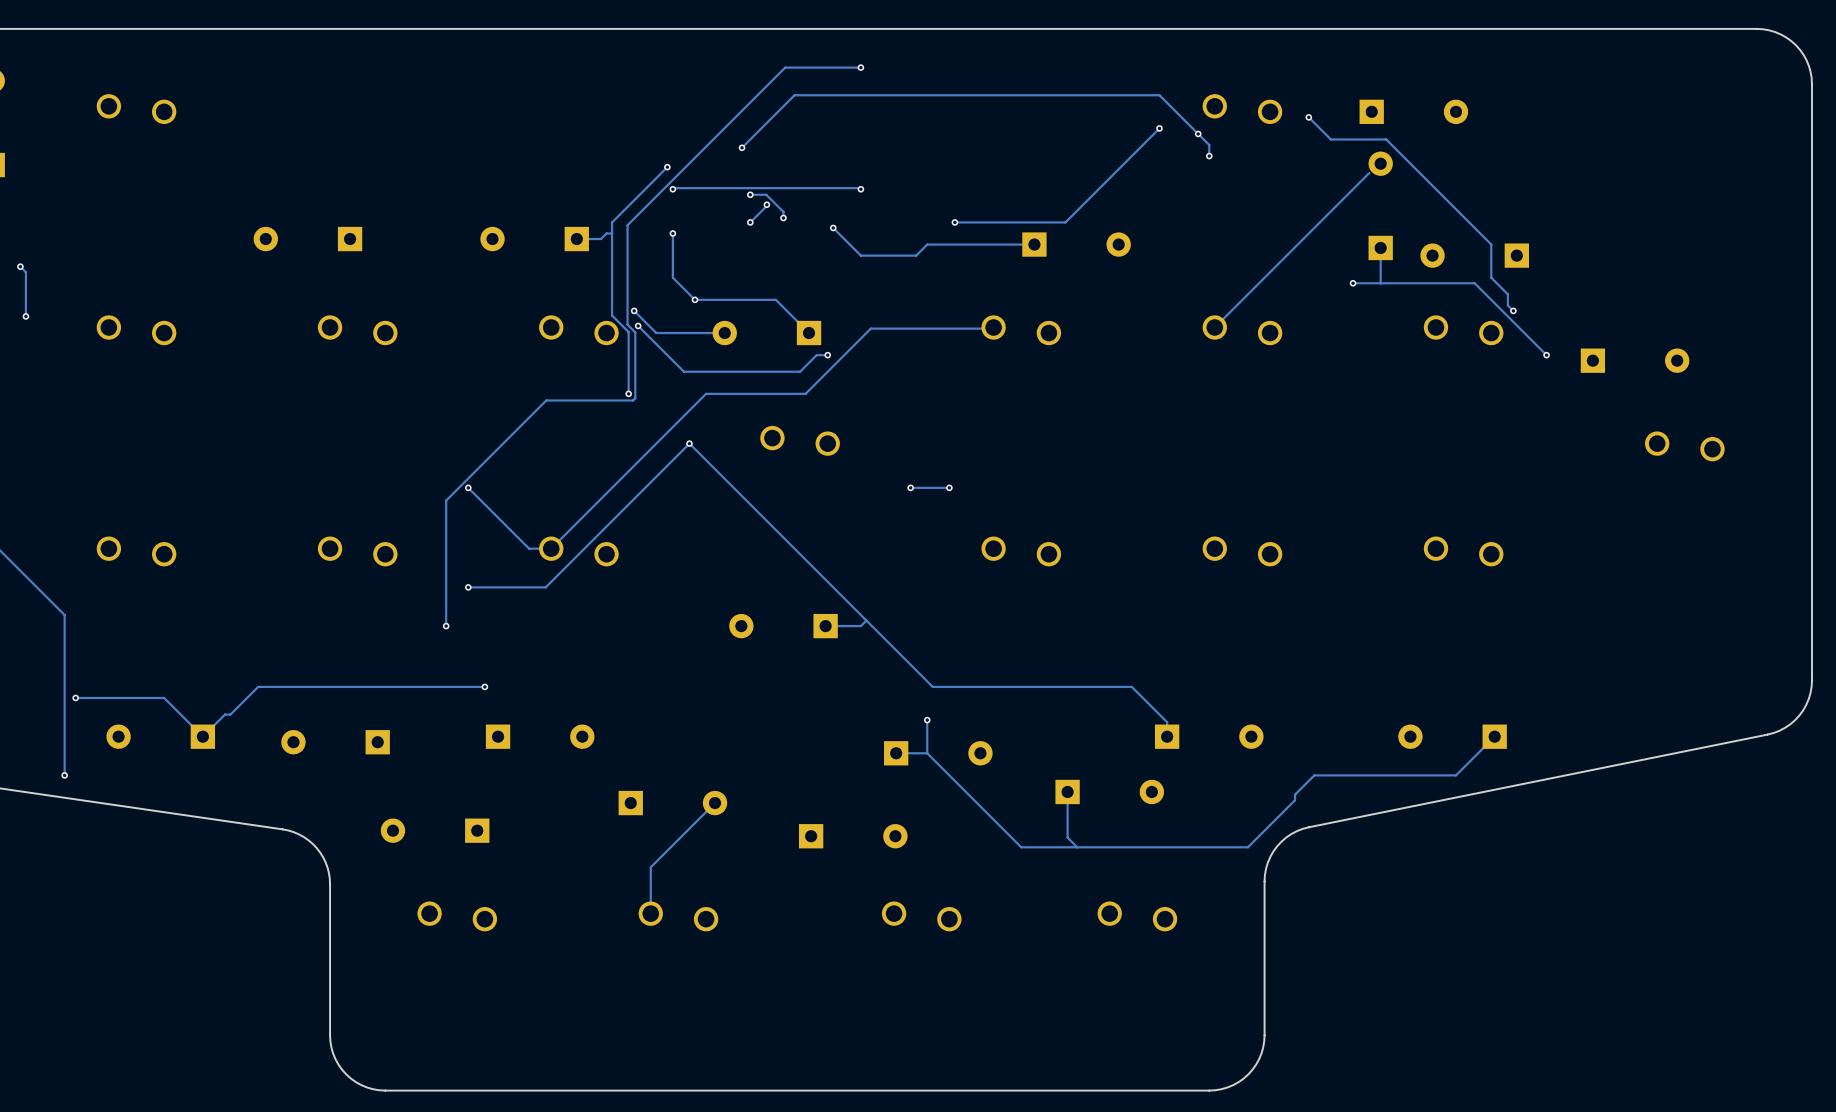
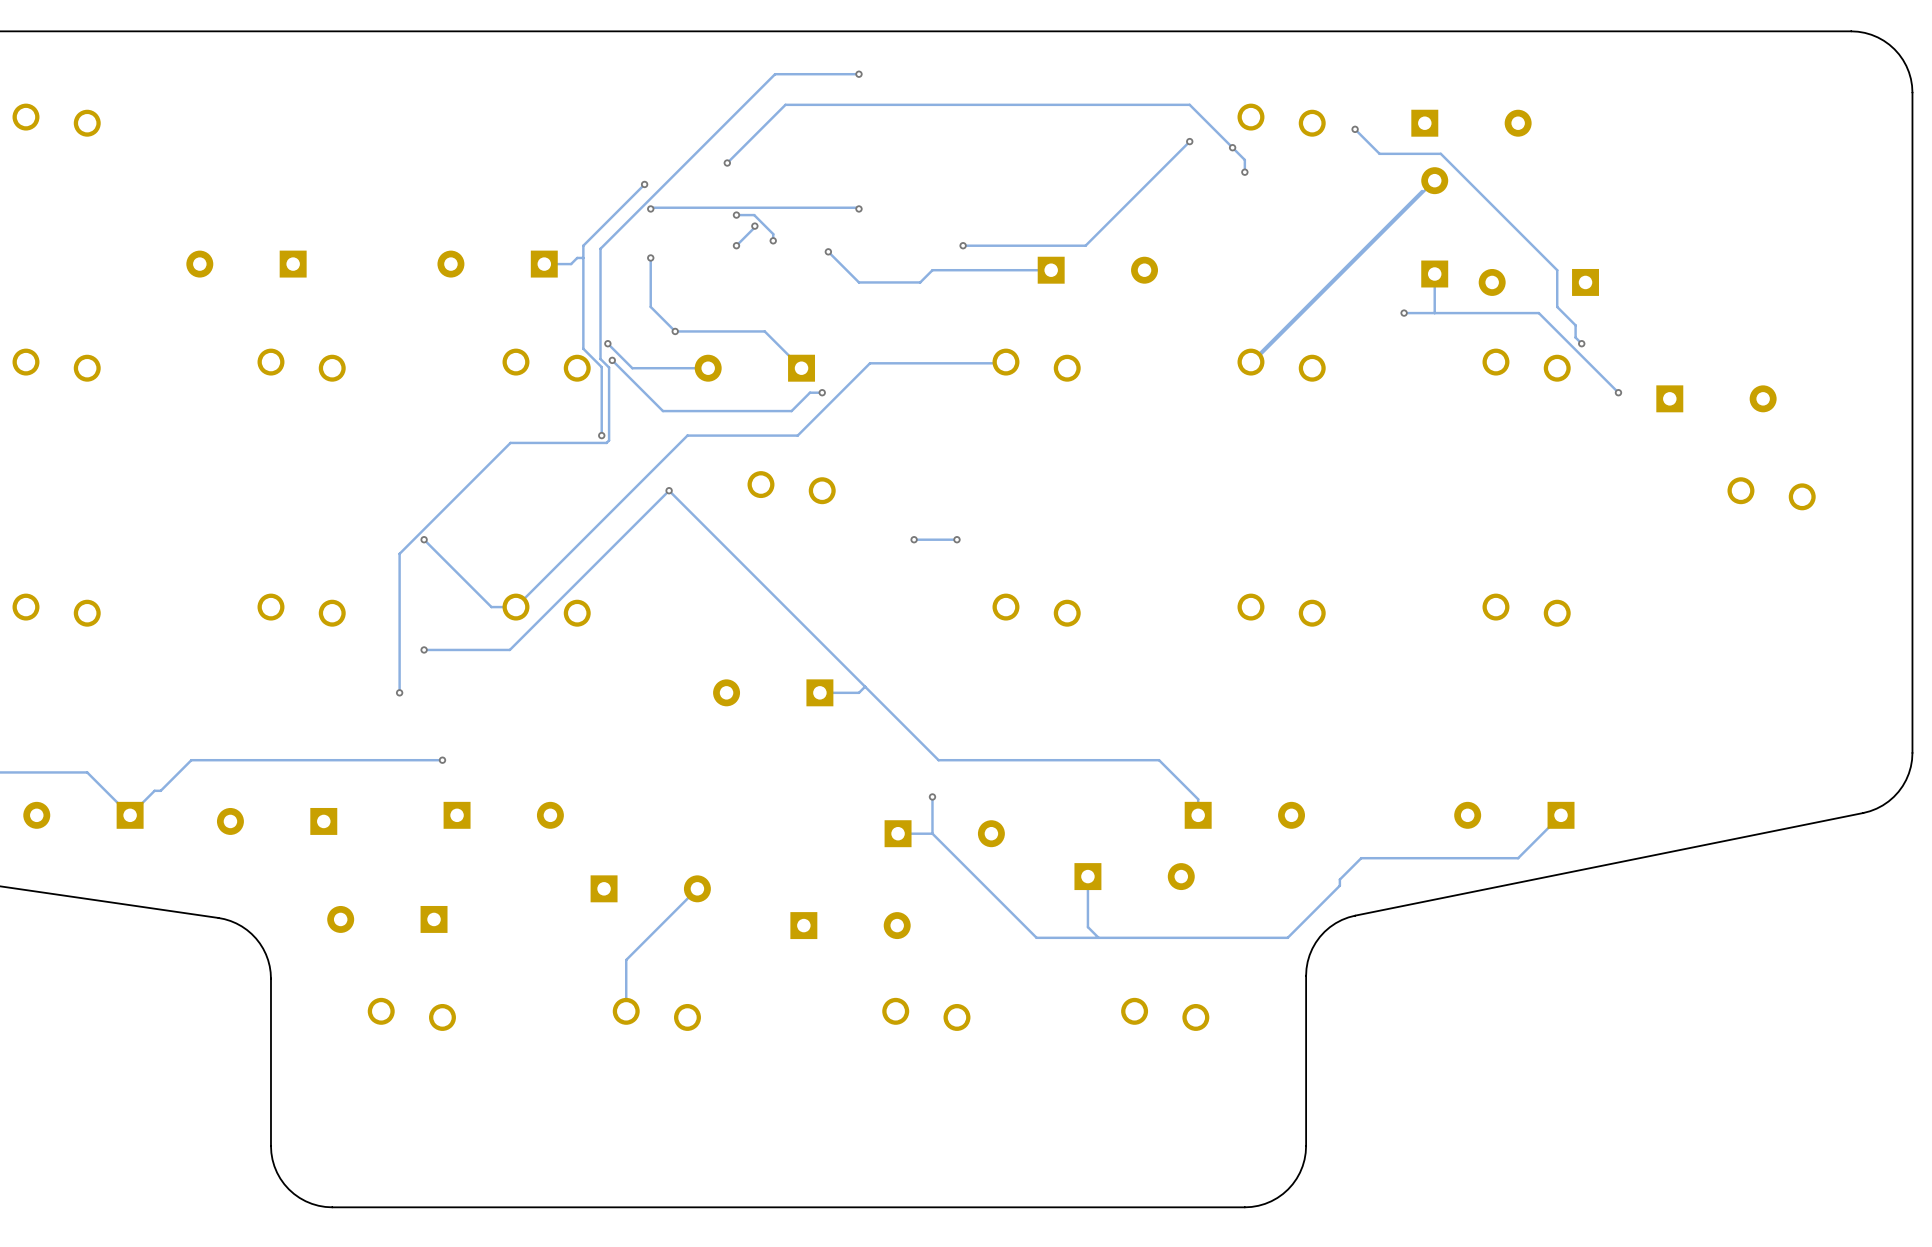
track: none -> (1434, 180) (1253, 362) (1250, 362)

